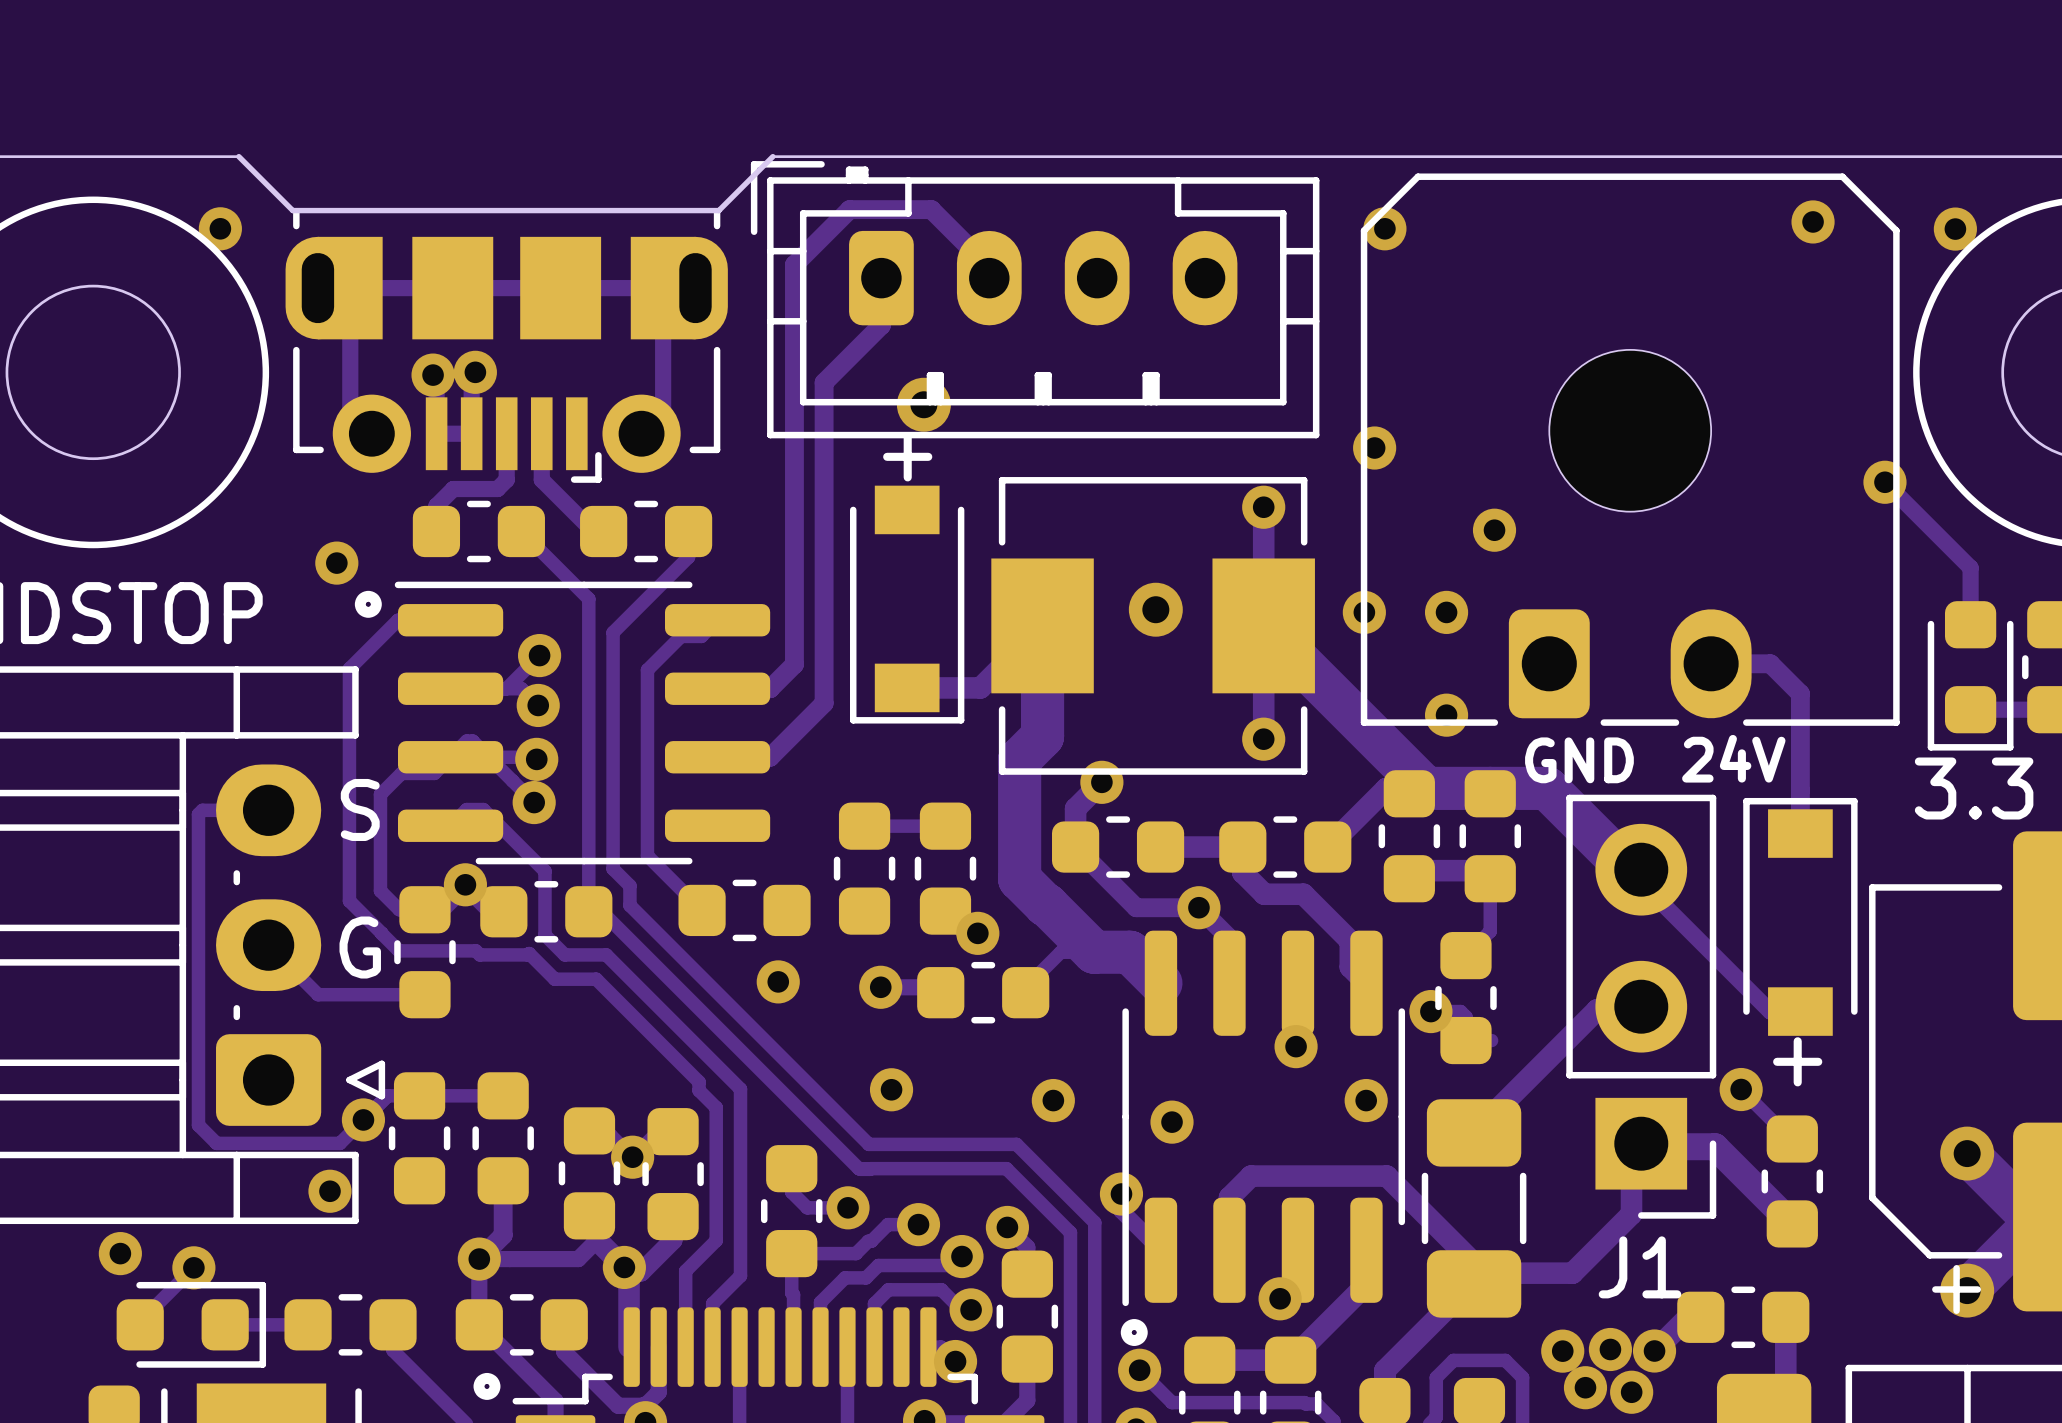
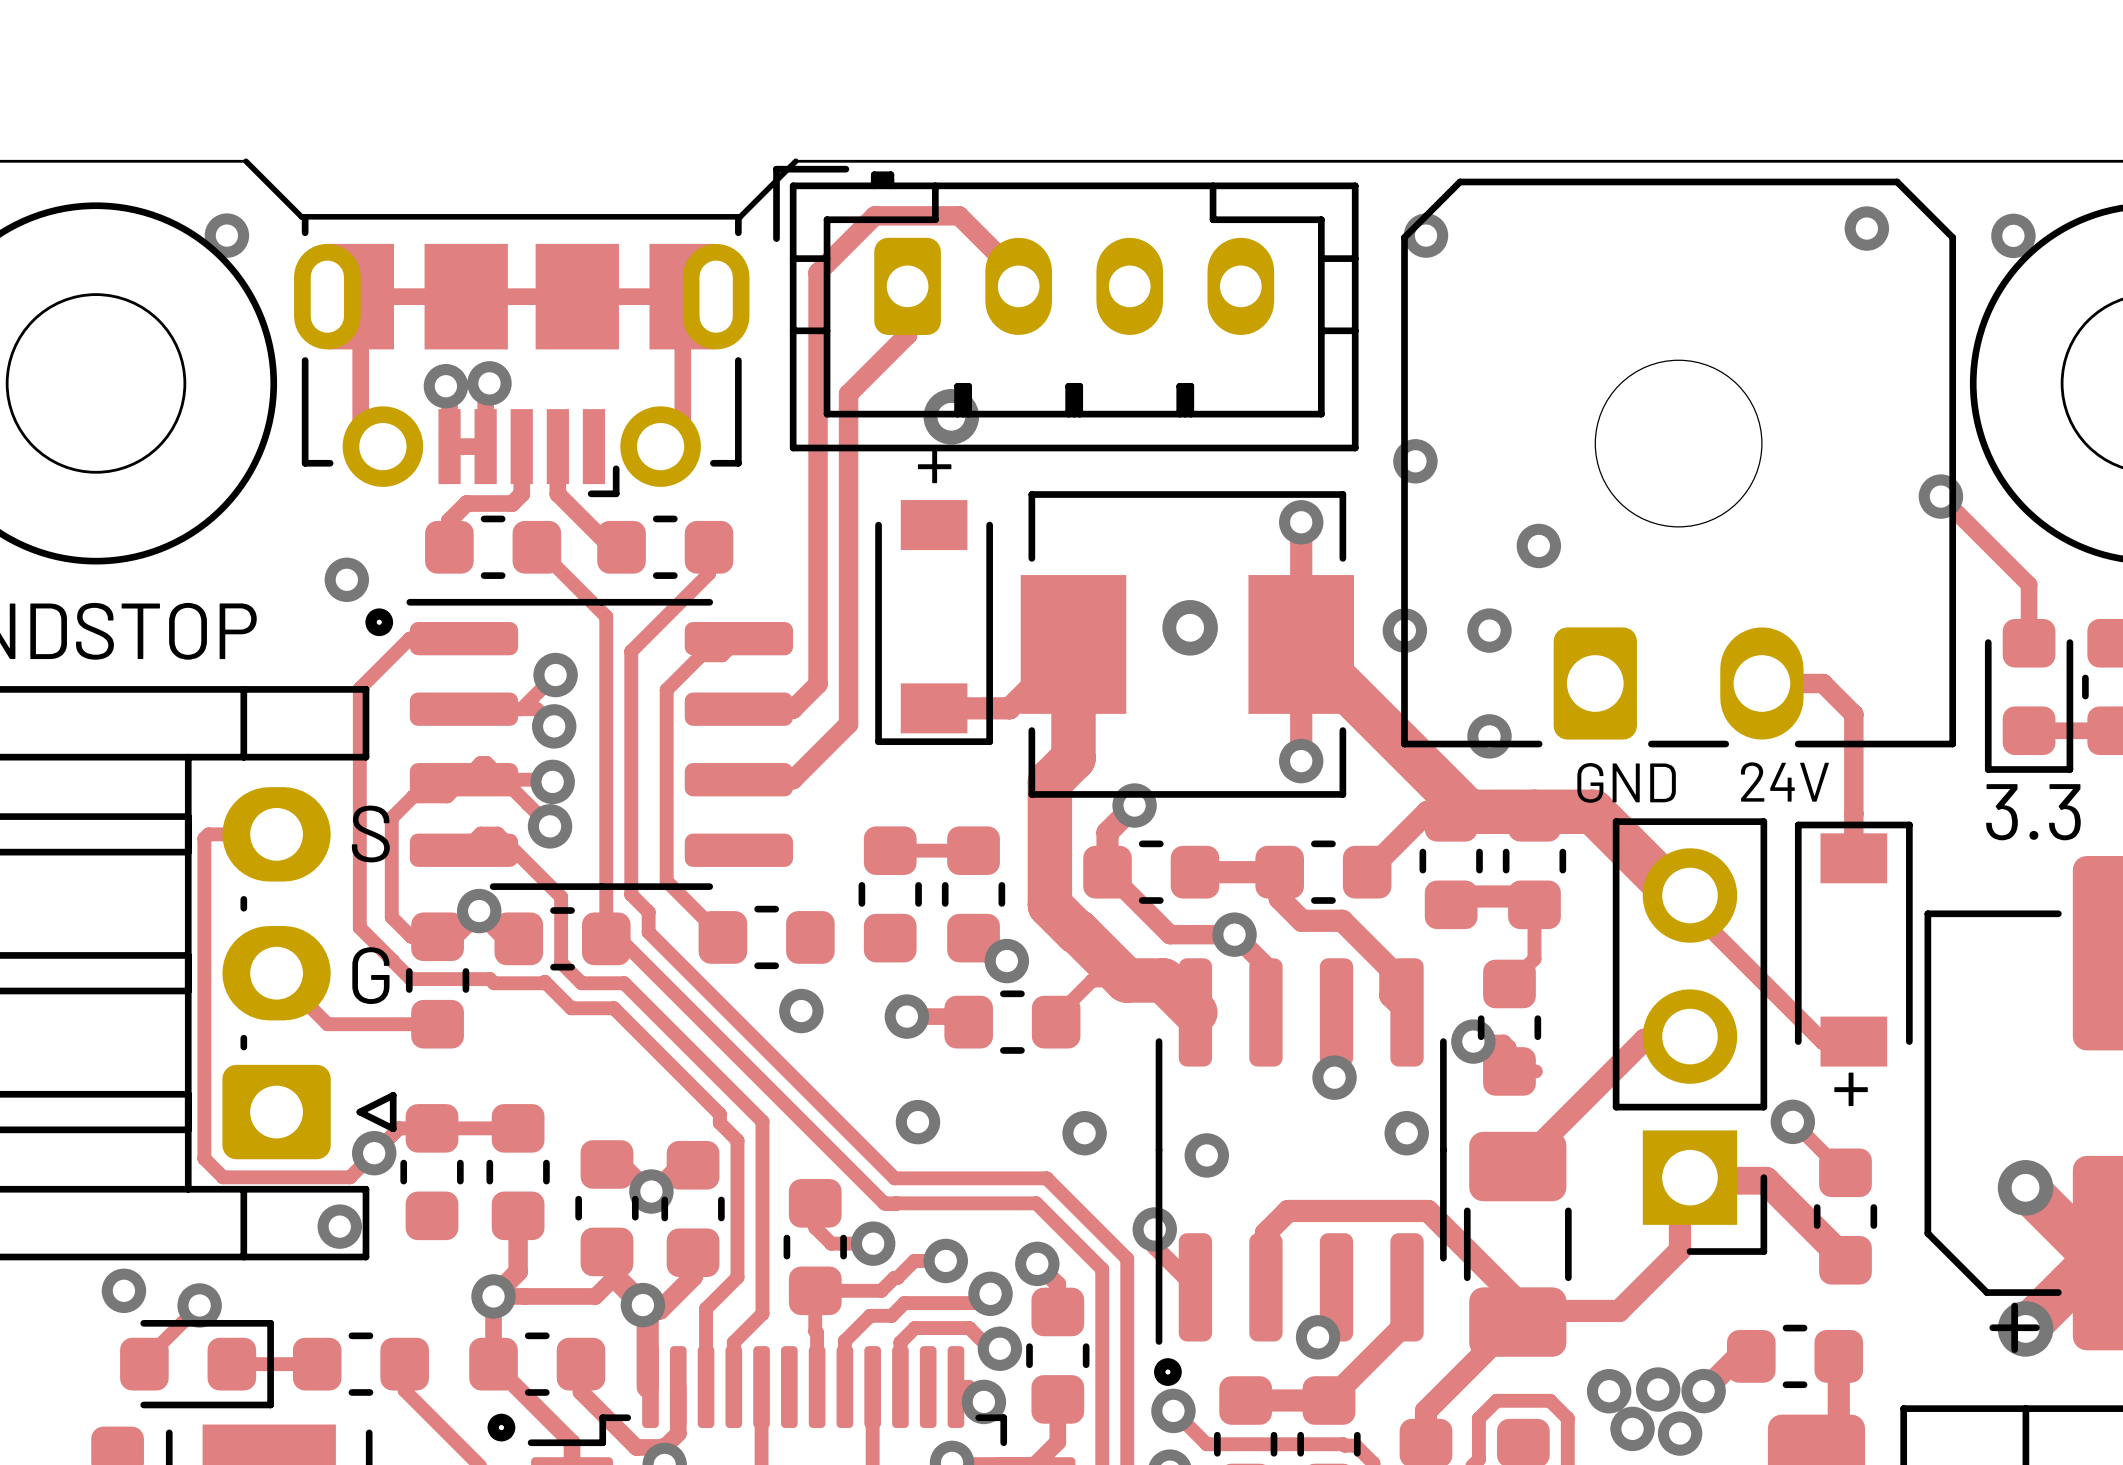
J1 name: J1 (1639, 1267) -> none

